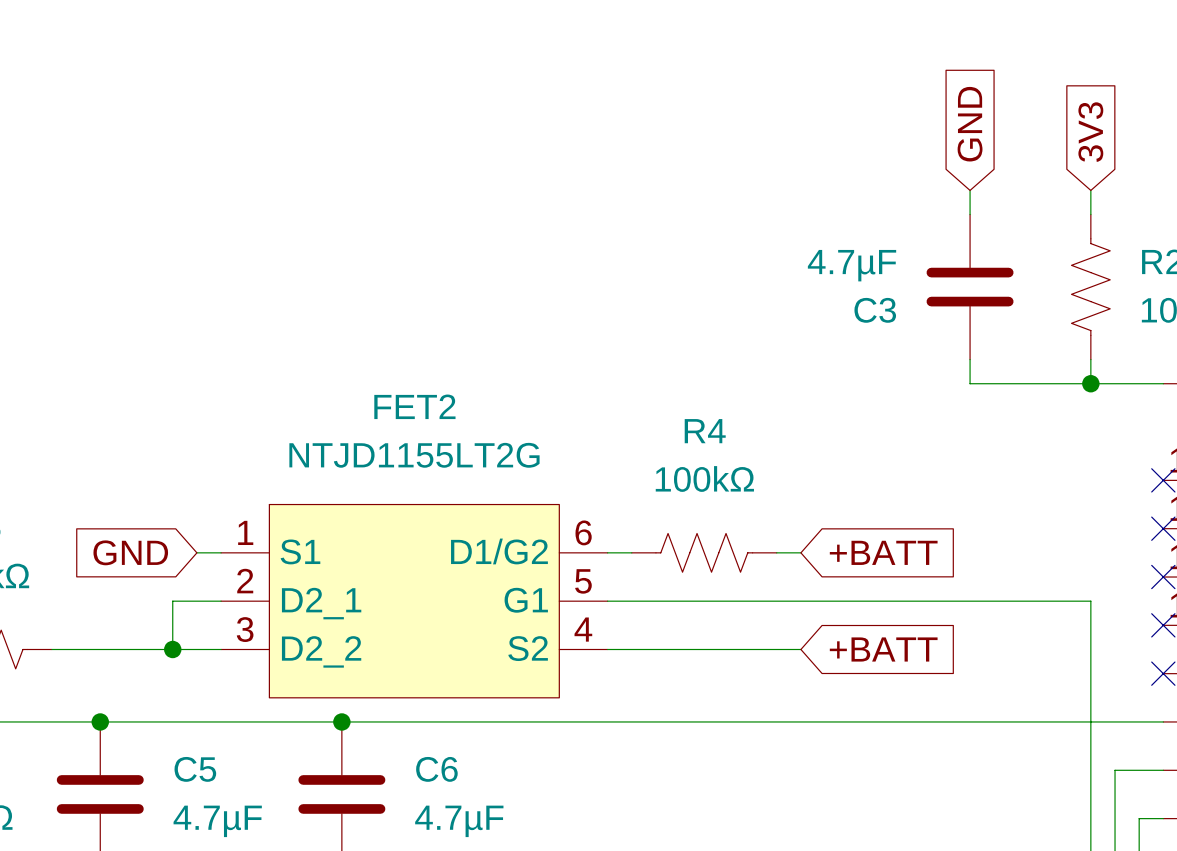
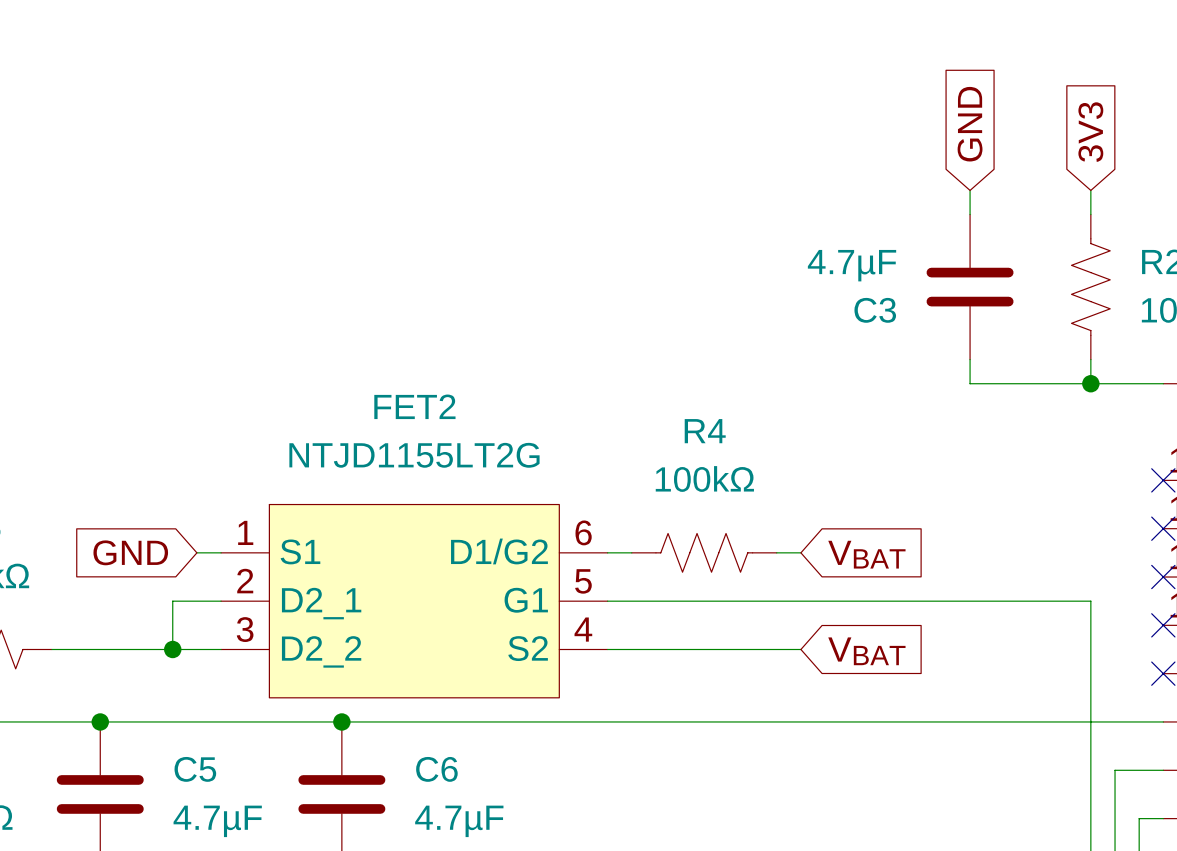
global label: +BATT (883, 552) -> VBAT (866, 554)
global label: +BATT (883, 649) -> VBAT (866, 651)

